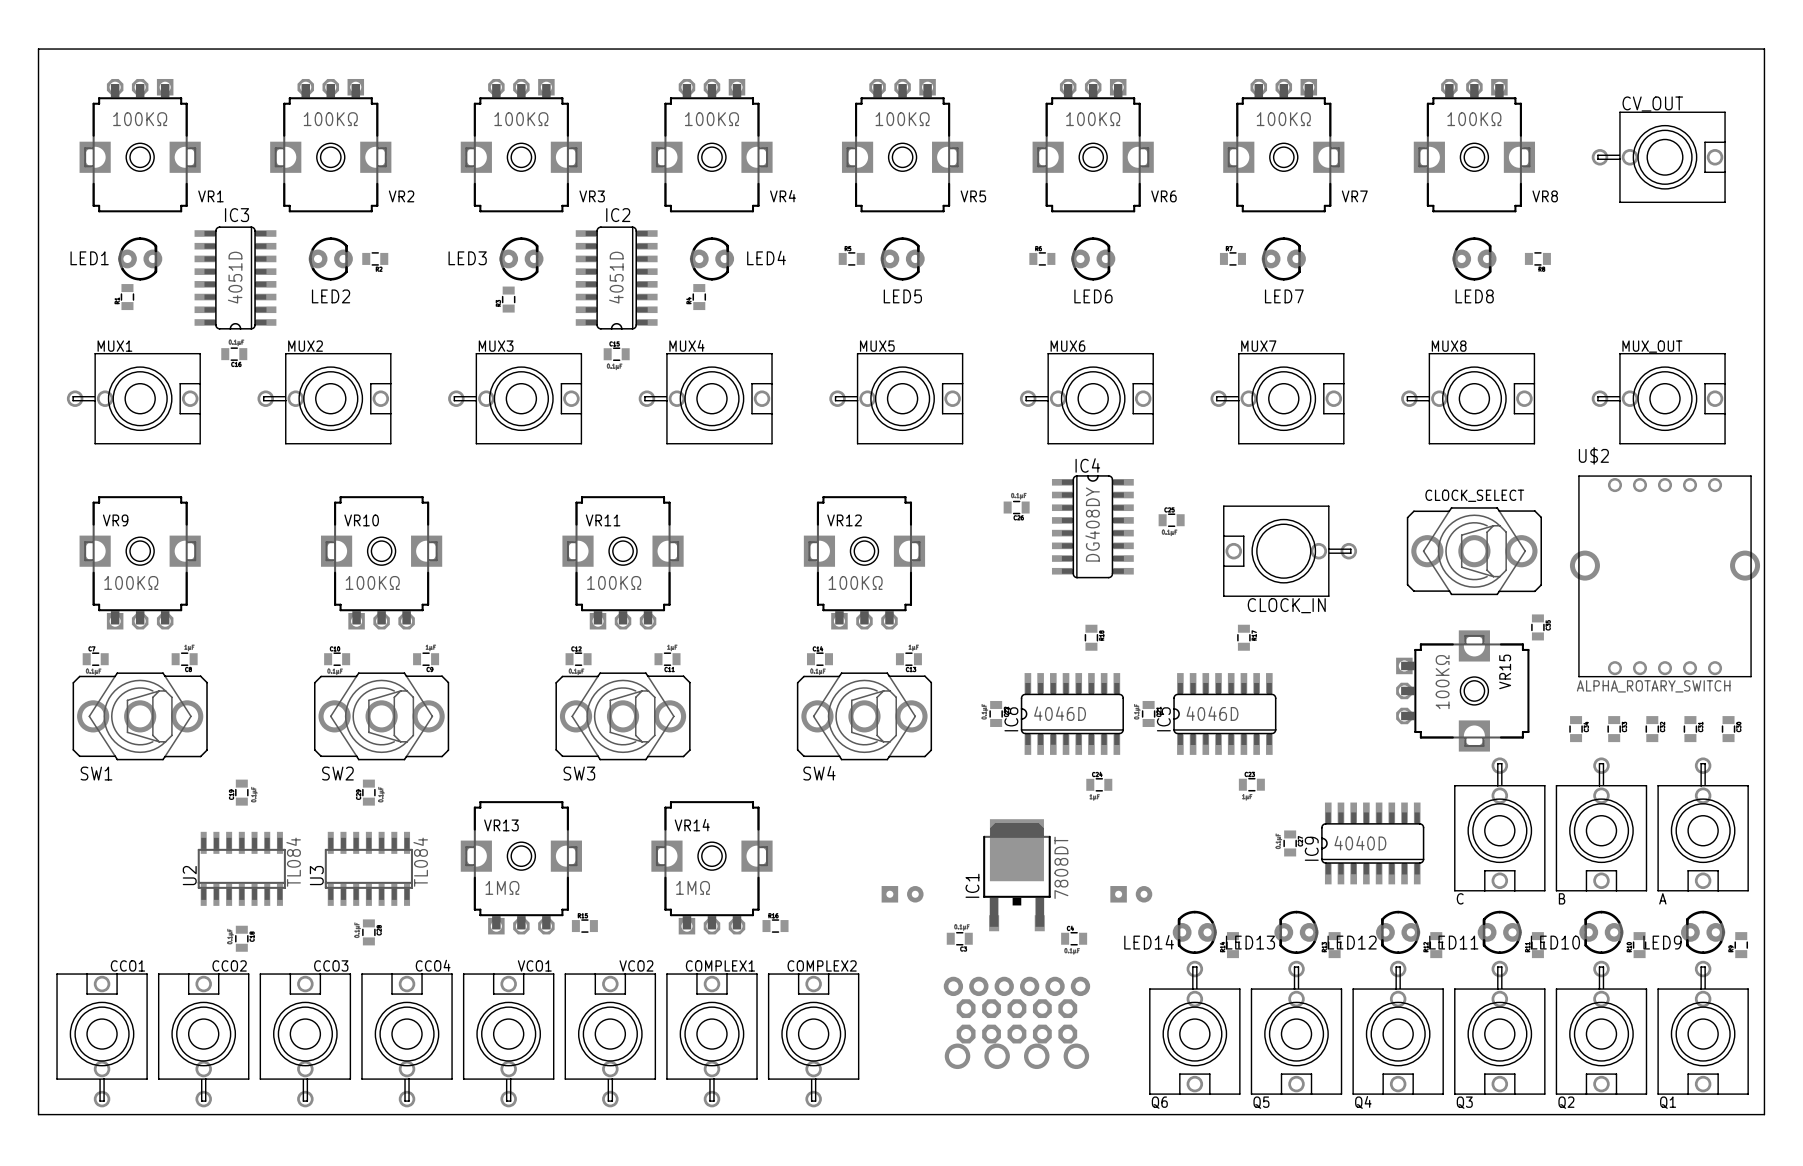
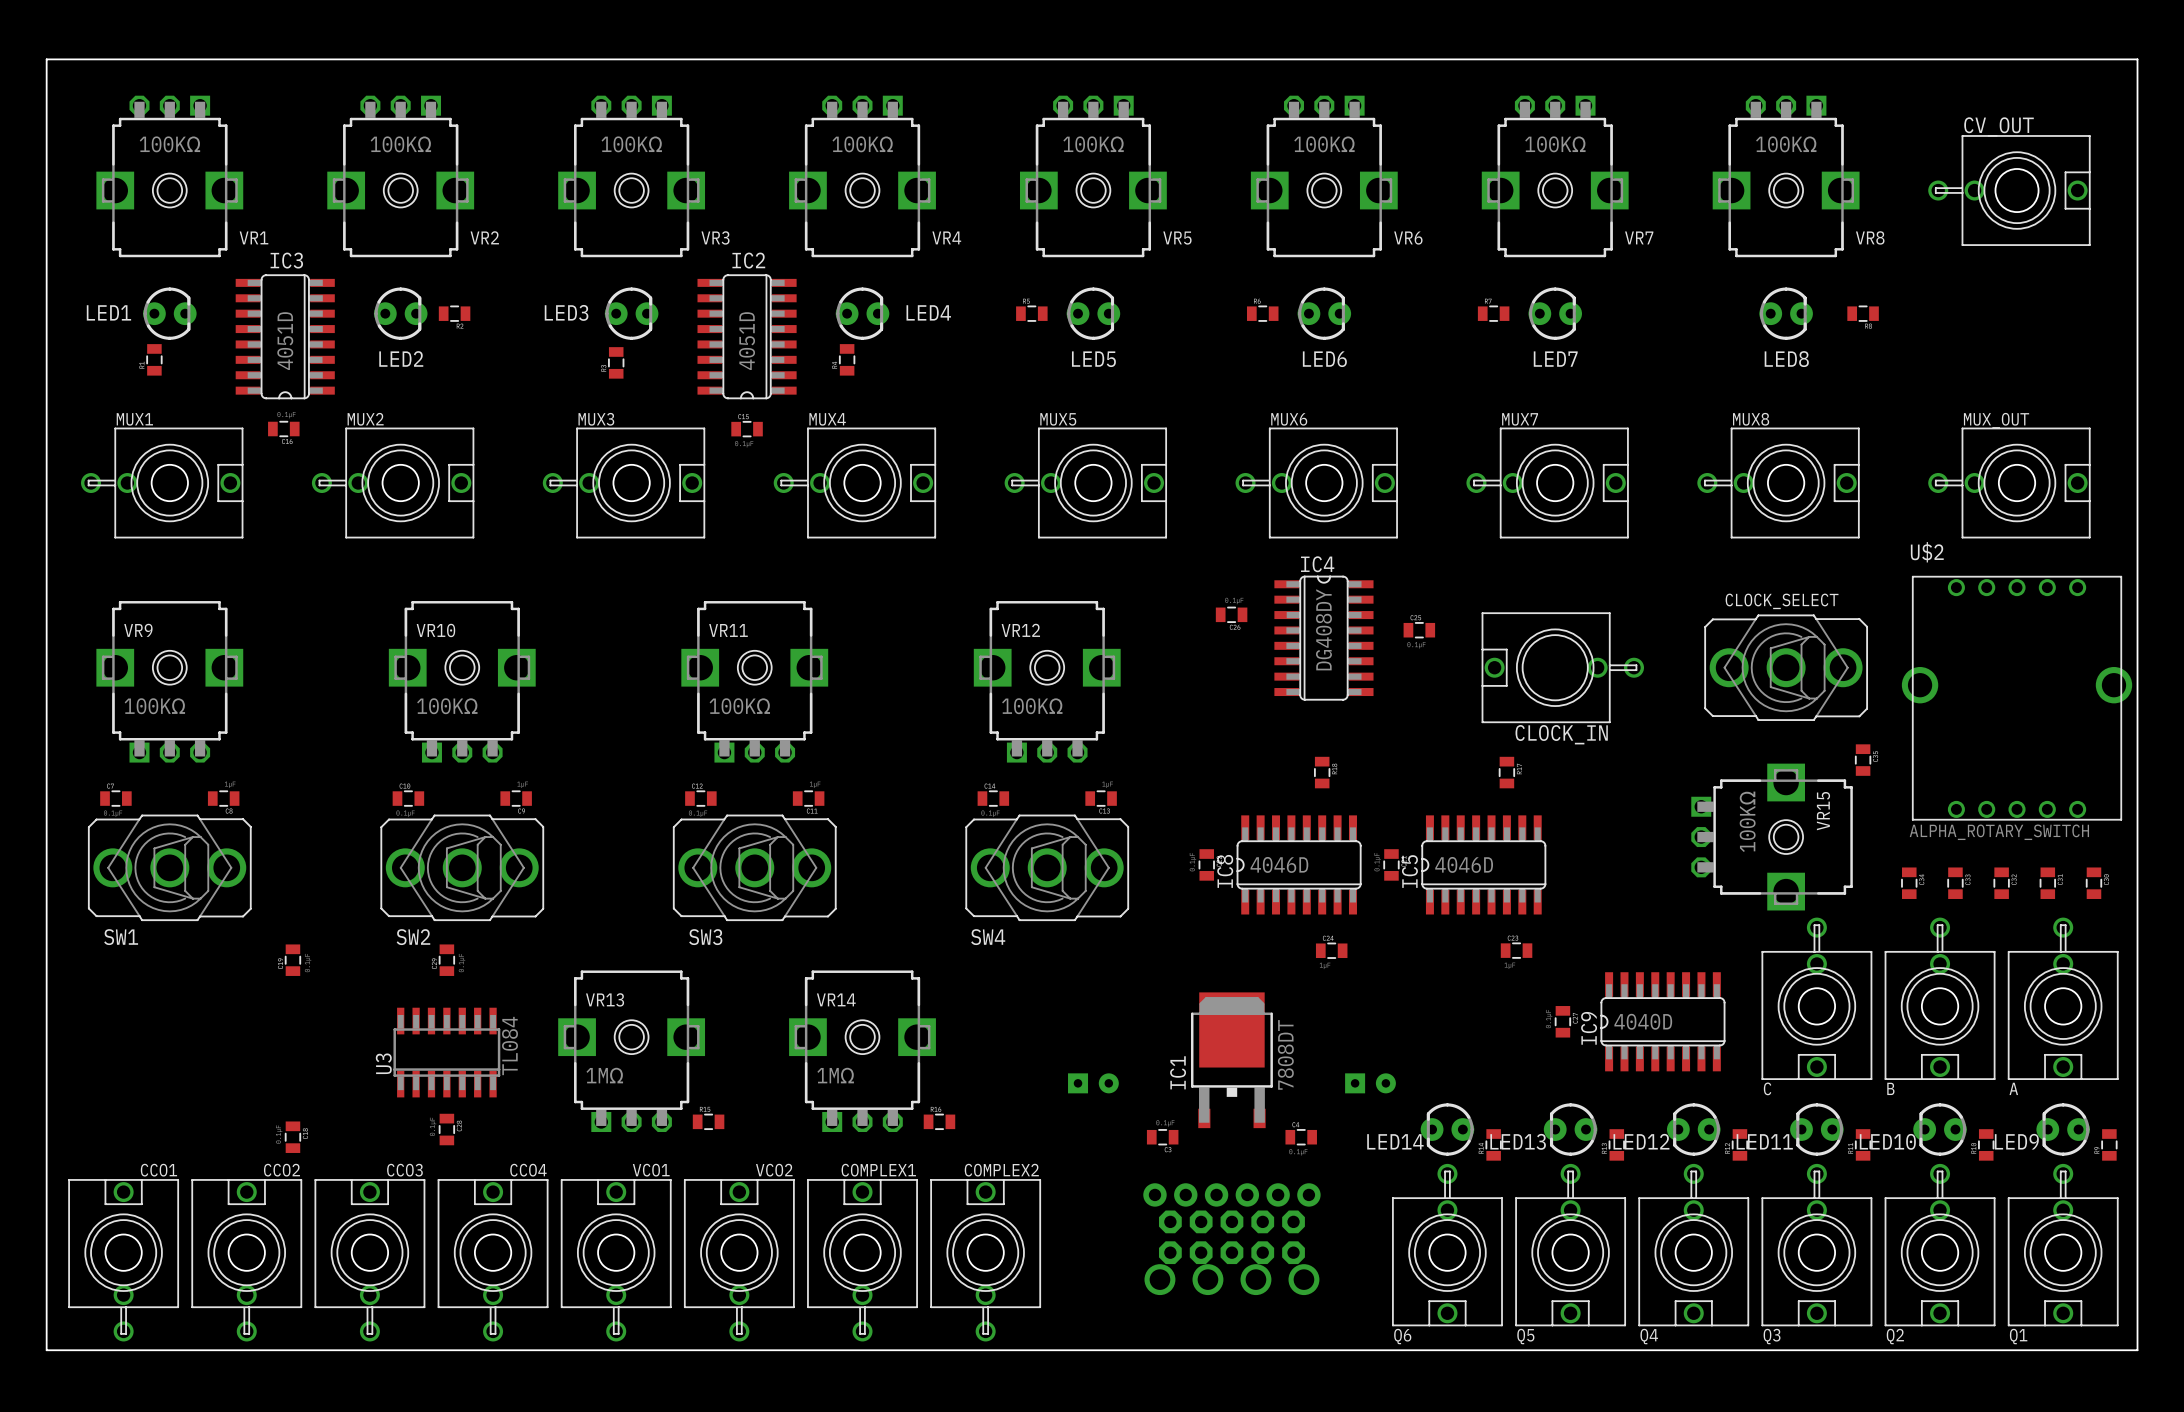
U2: TL084 (241, 868) -> none

